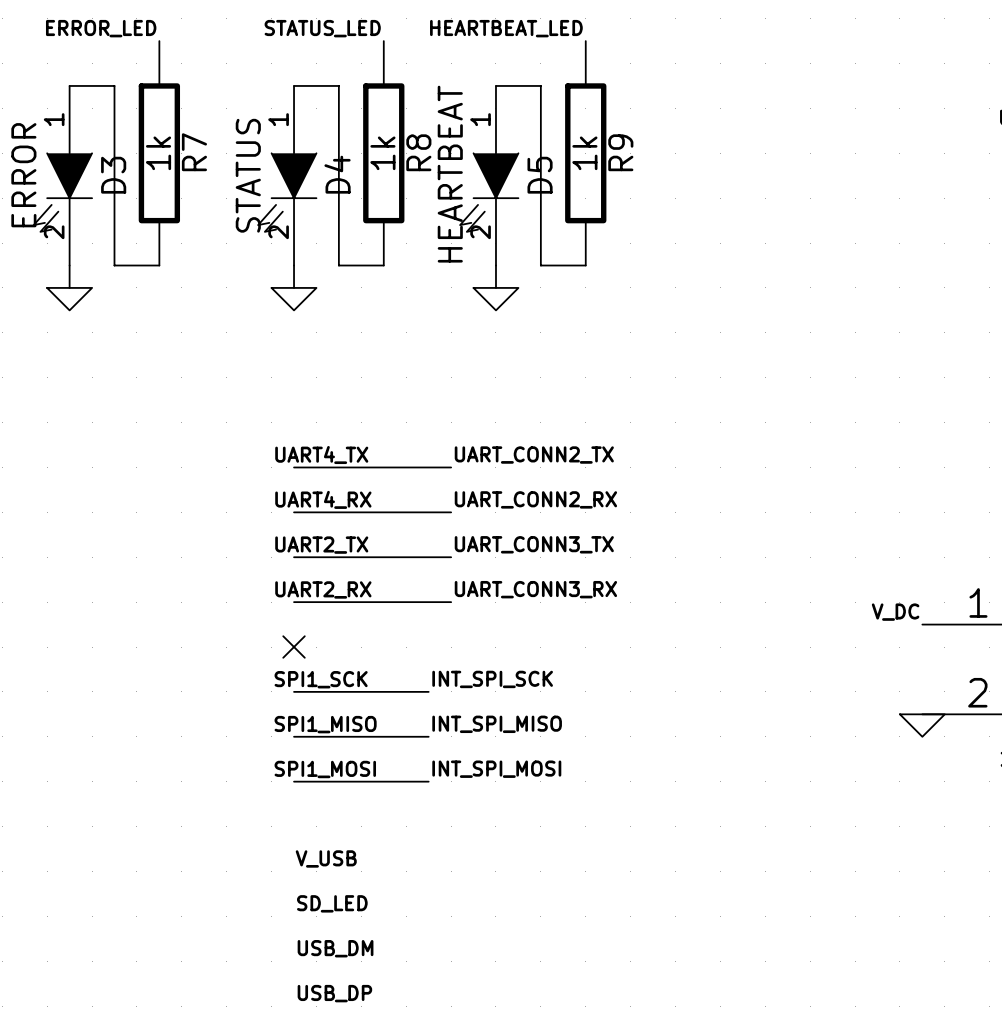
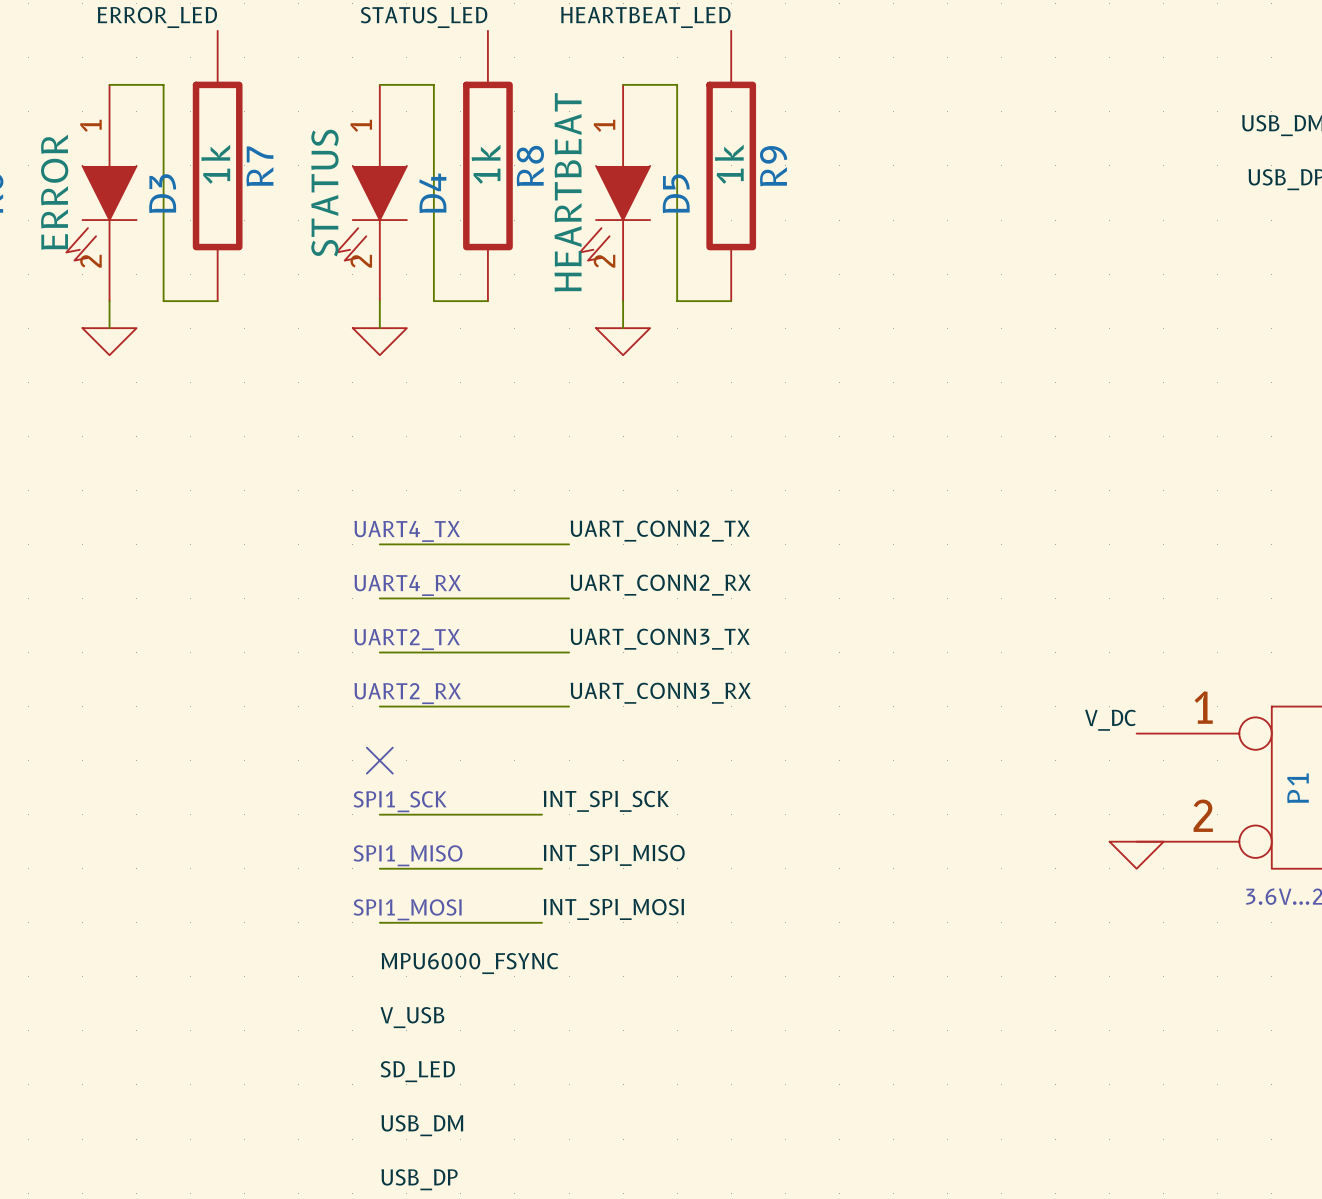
label: none -> MPU6000_FSYNC (469, 963)

